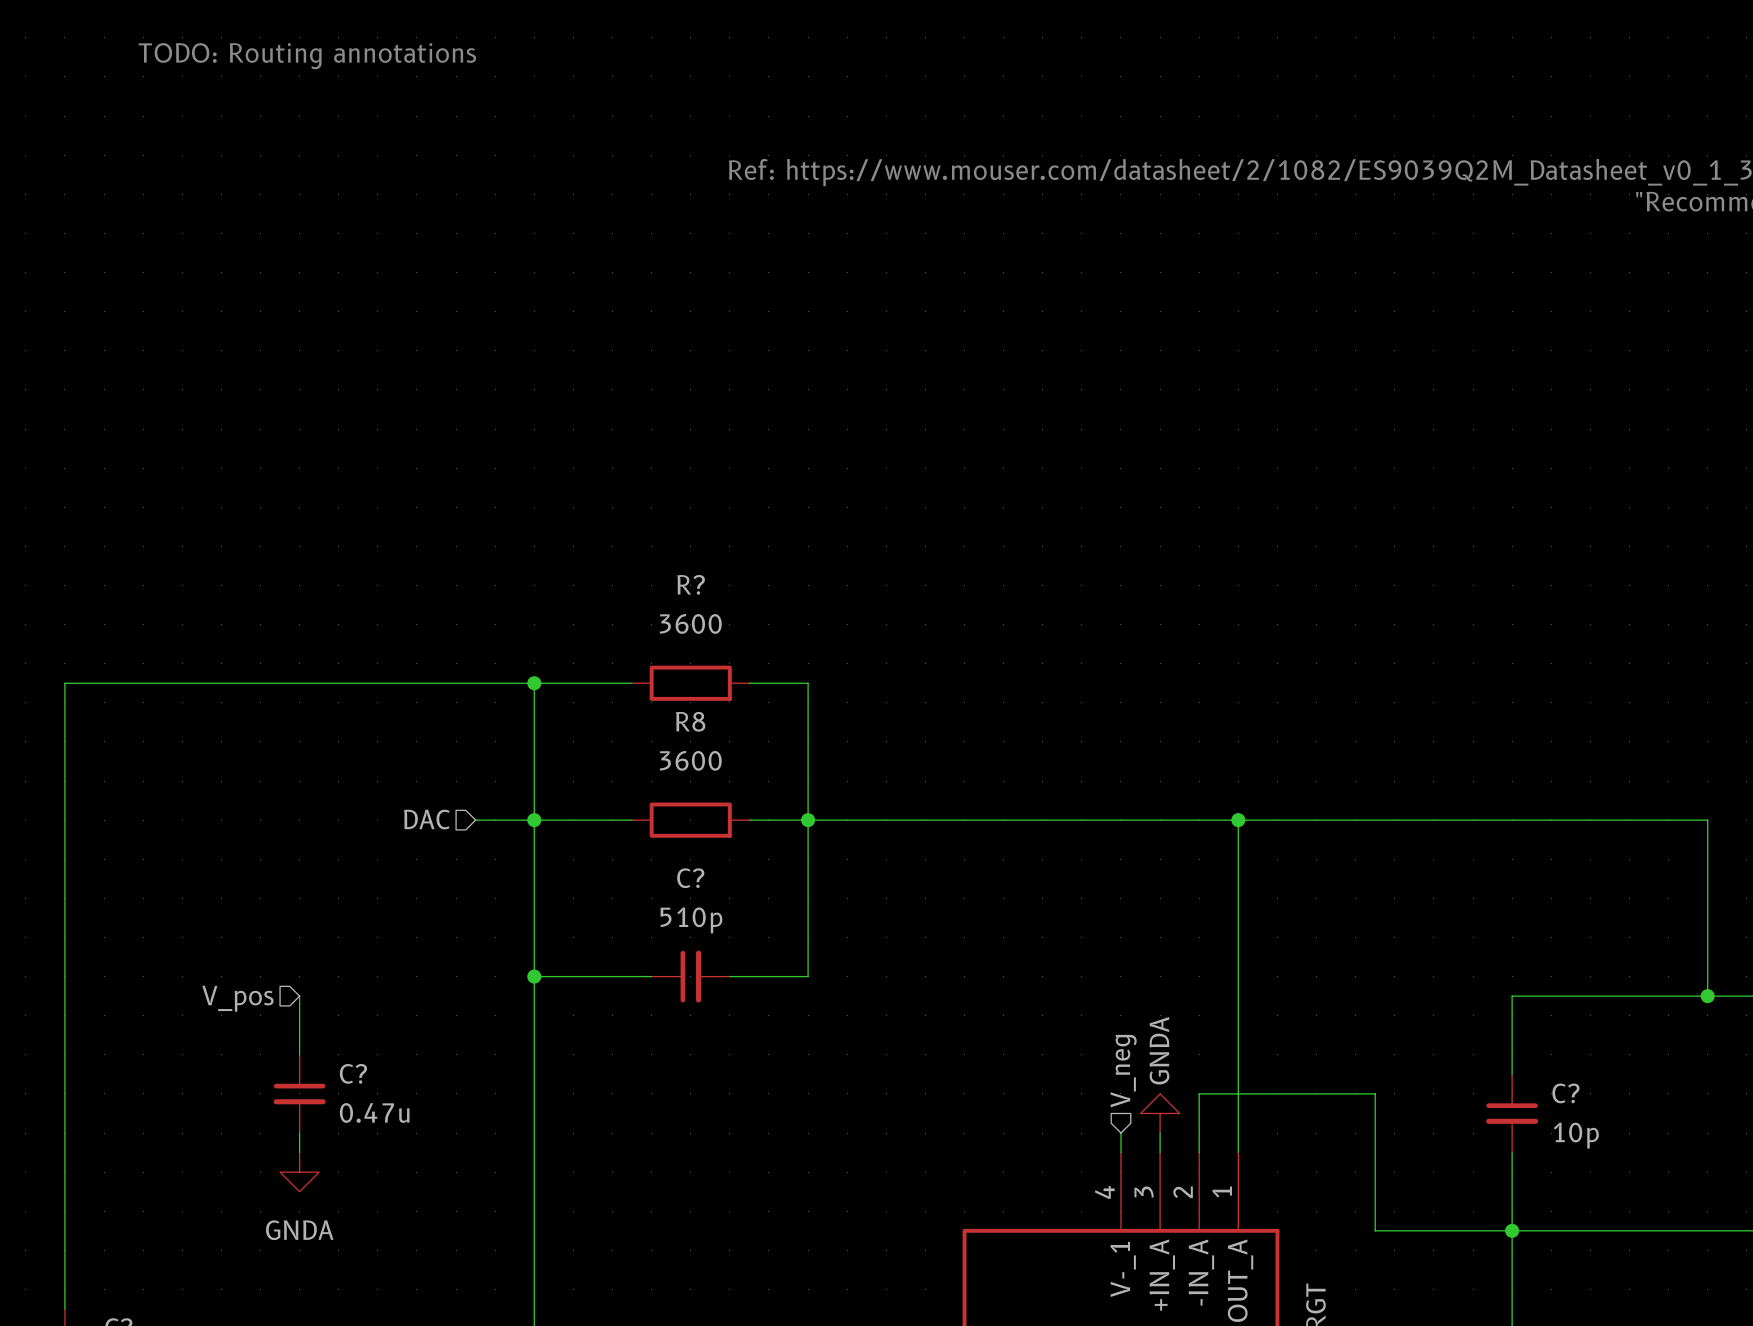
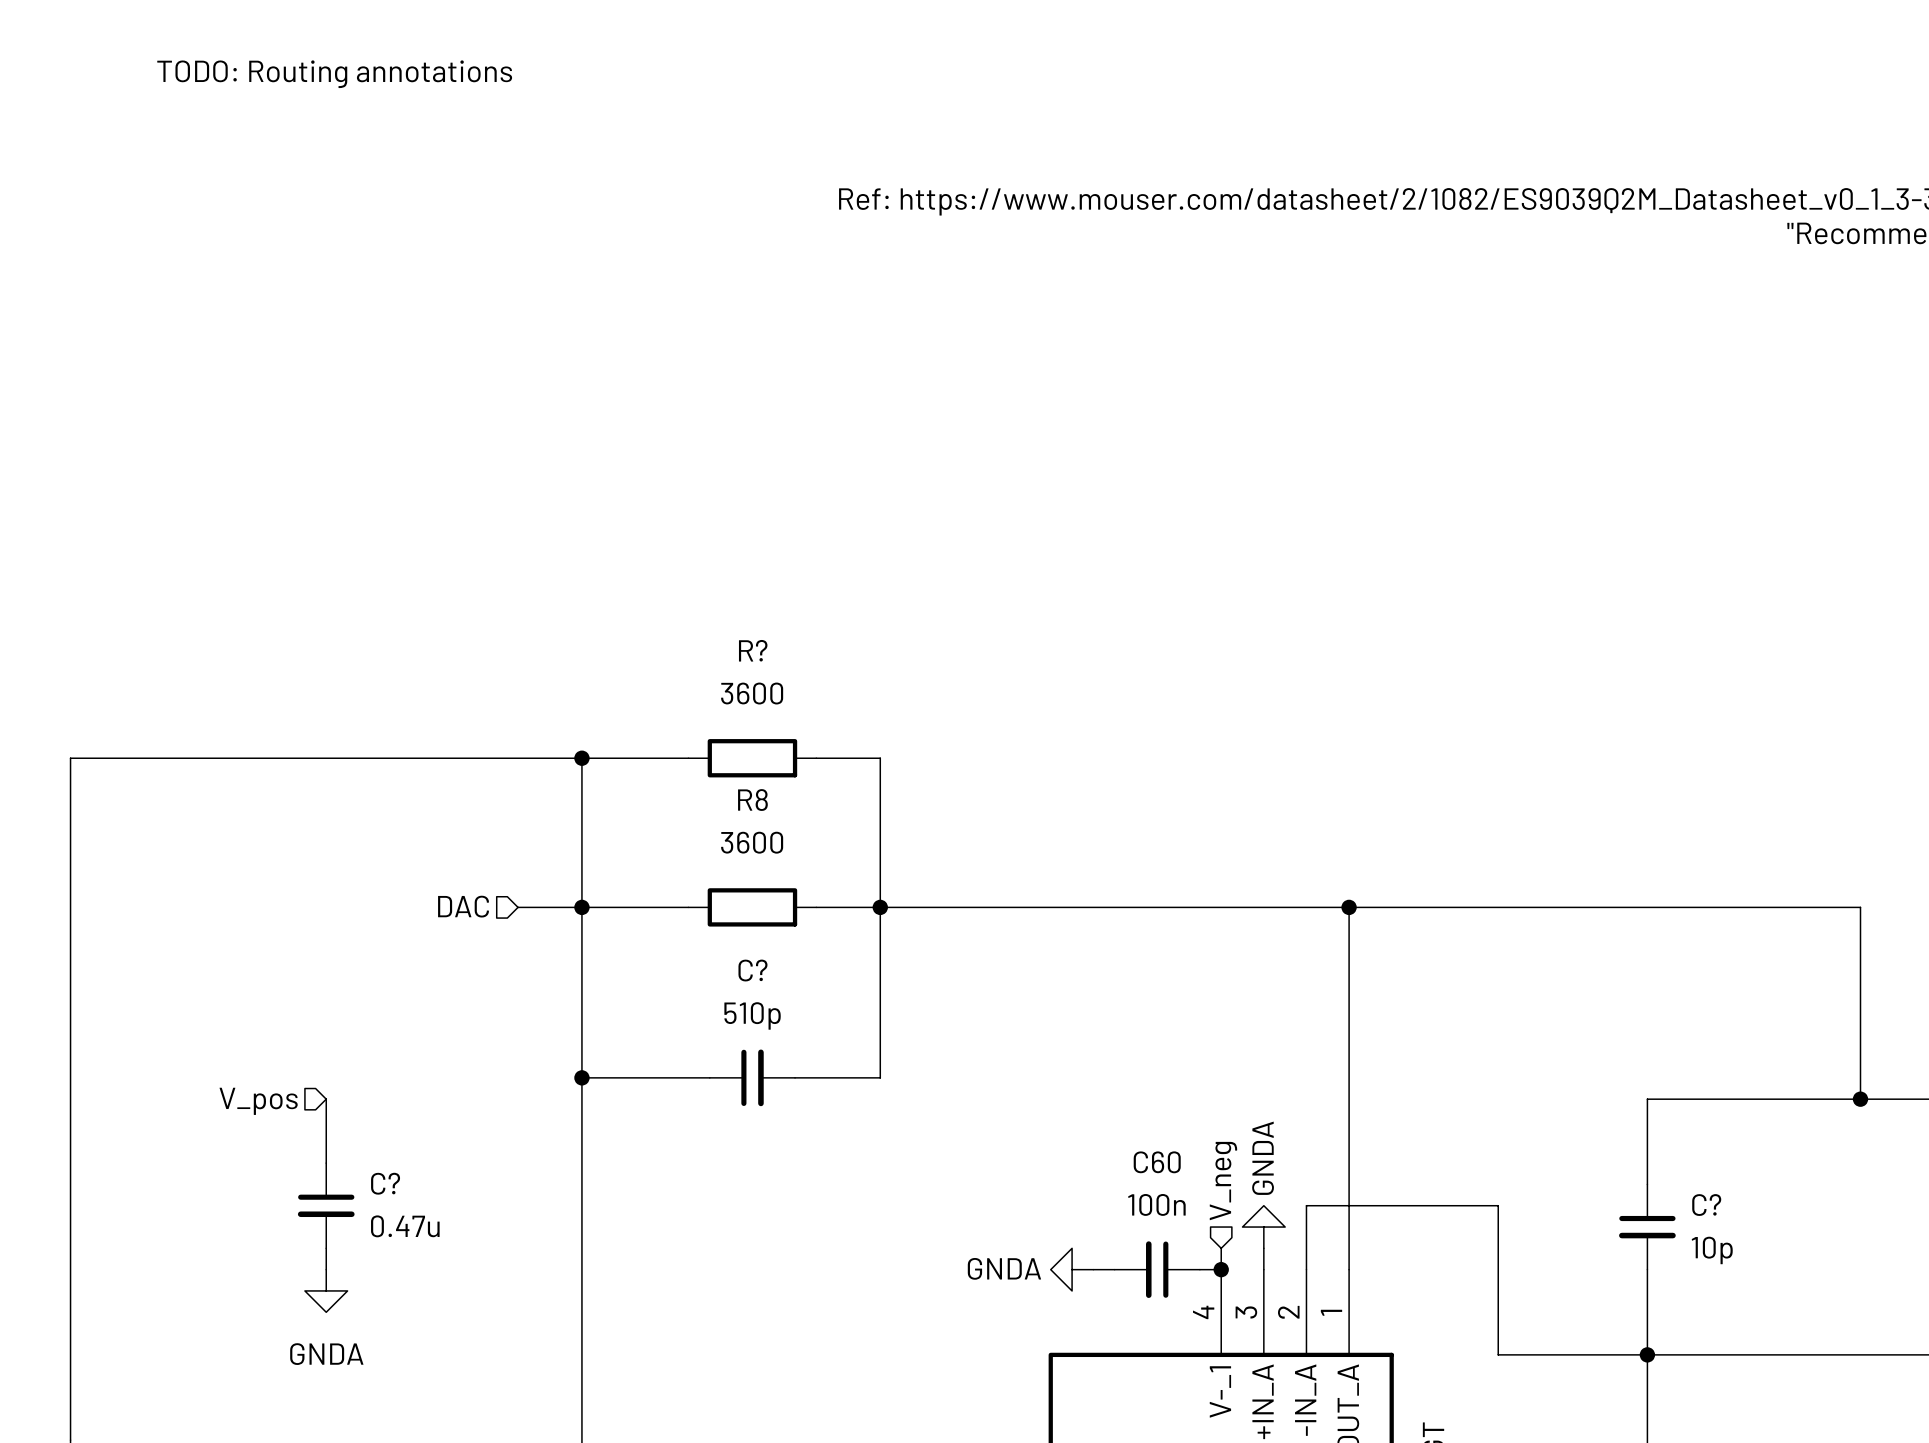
power symbol: none -> GNDA (1072, 1269)
wire: none -> (1093, 1269) (1114, 1269)
C60: none -> 100n (1157, 1269)
wire: none -> (1199, 1269) (1221, 1269)
junction: none -> (1221, 1269)

